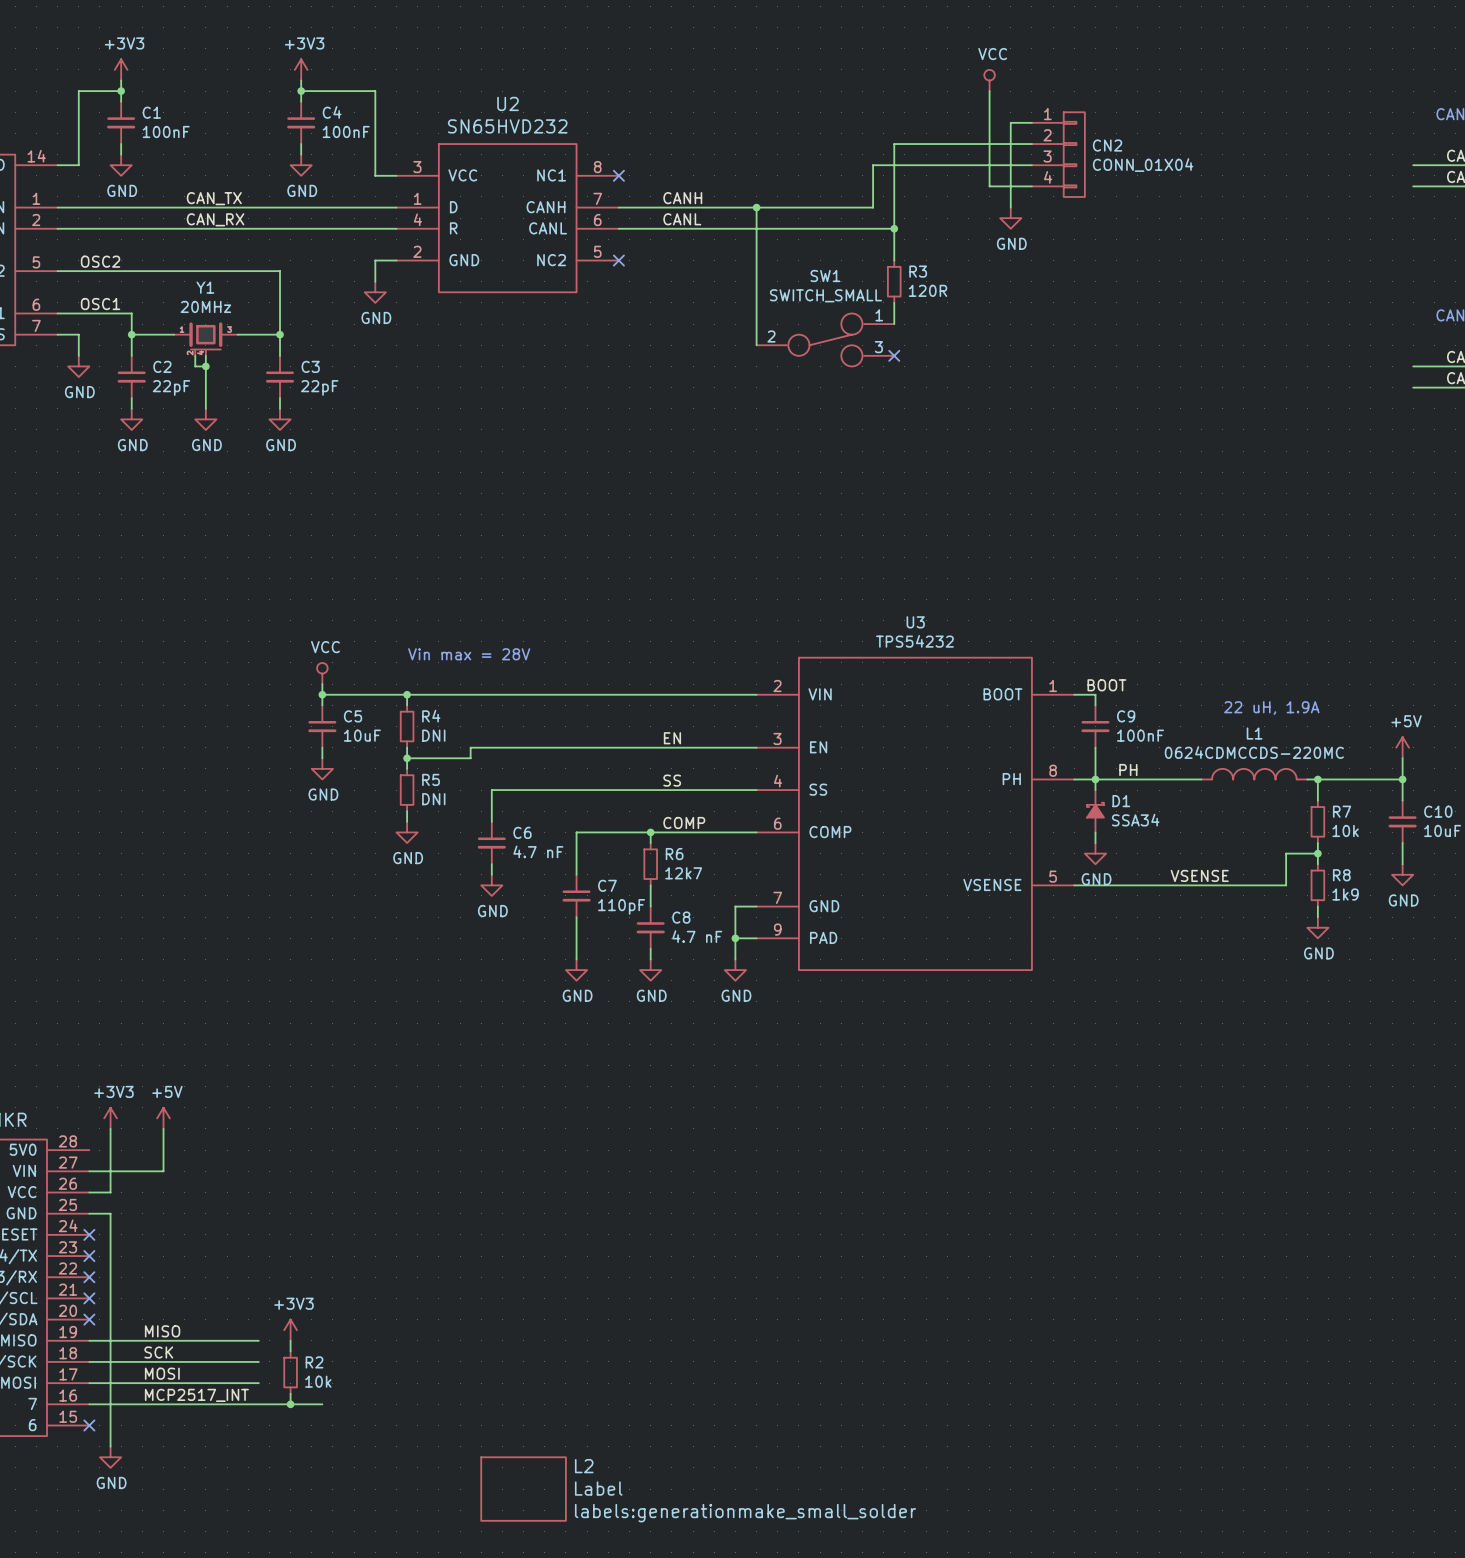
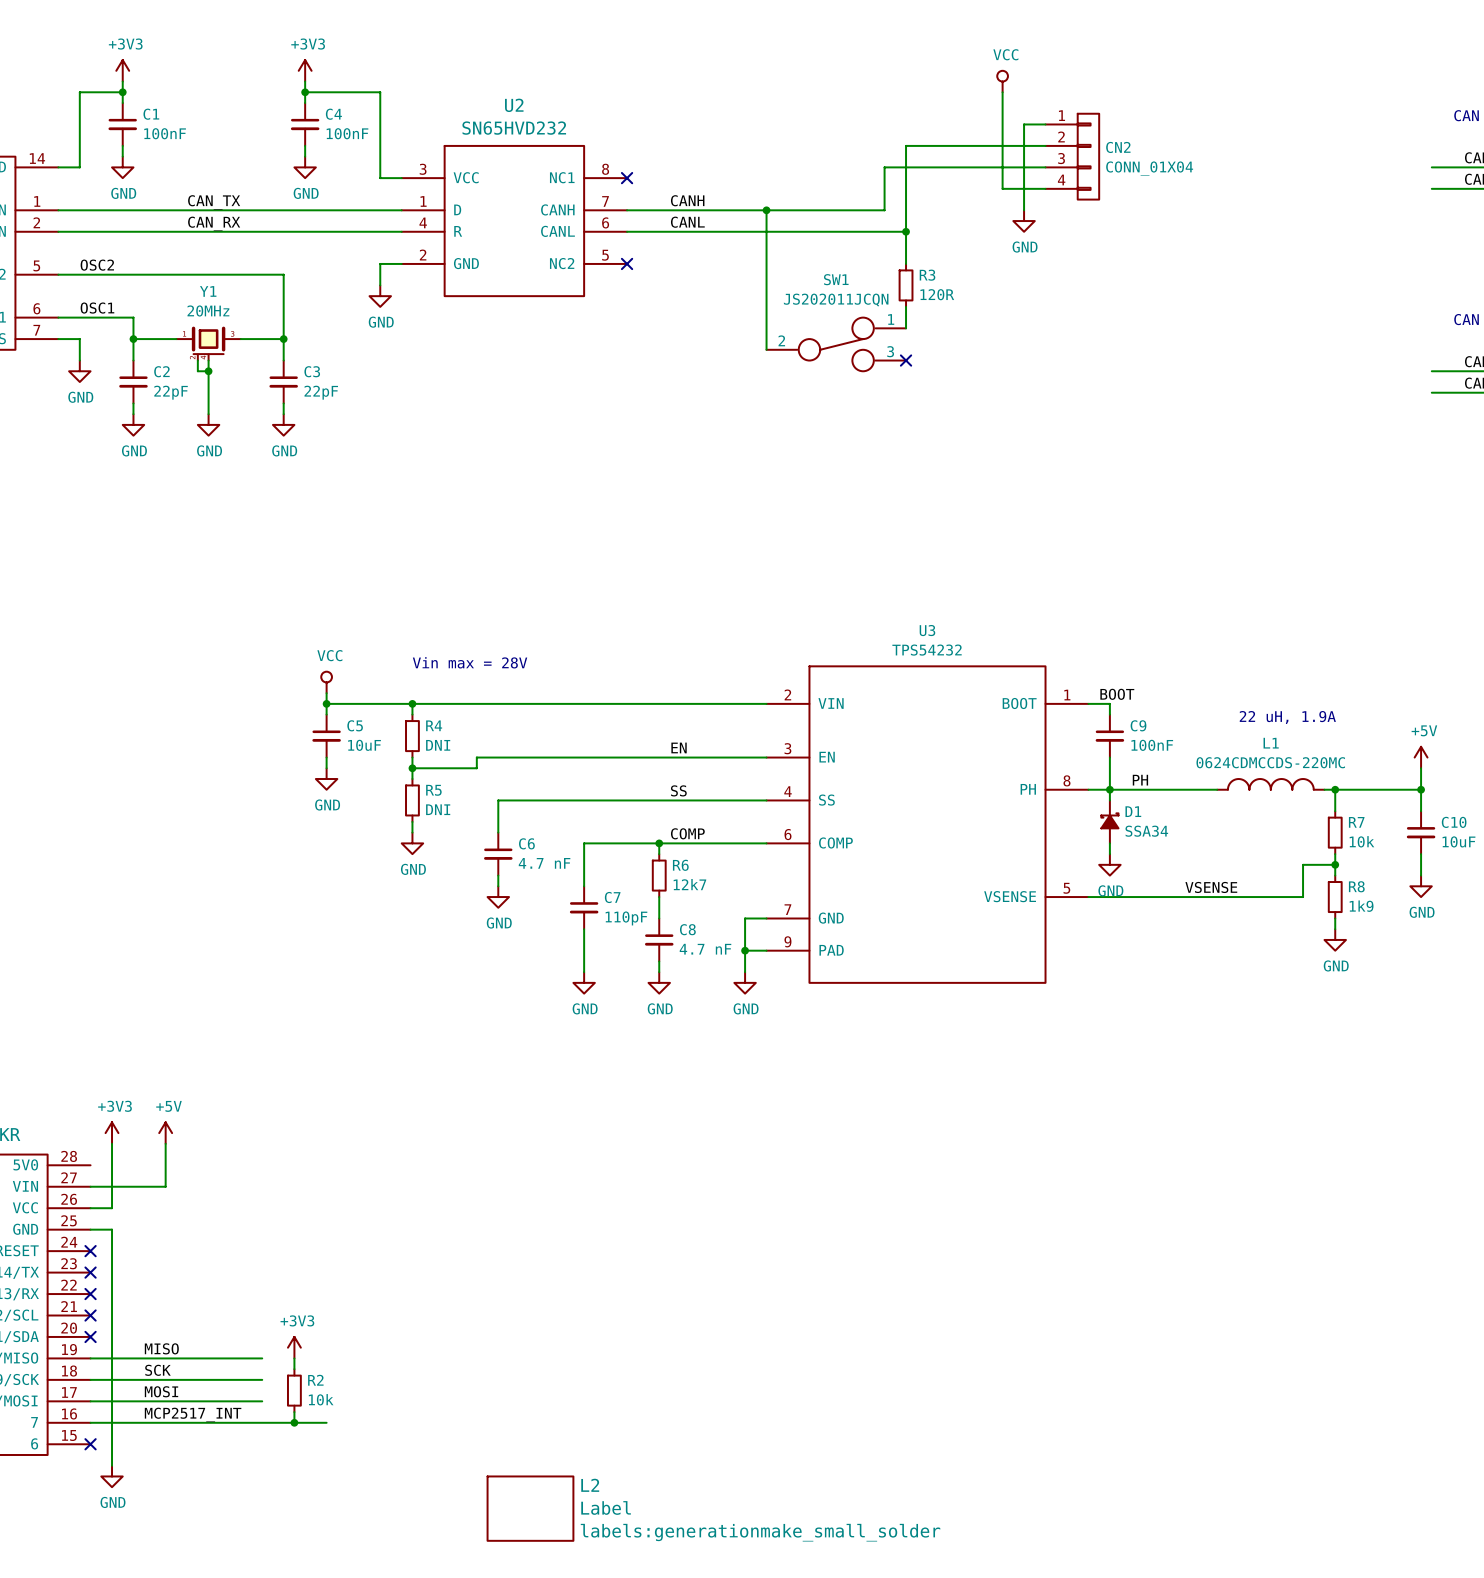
SW1 value: SWITCH_SMALL (825, 295) -> JS202011JCQN (836, 300)

